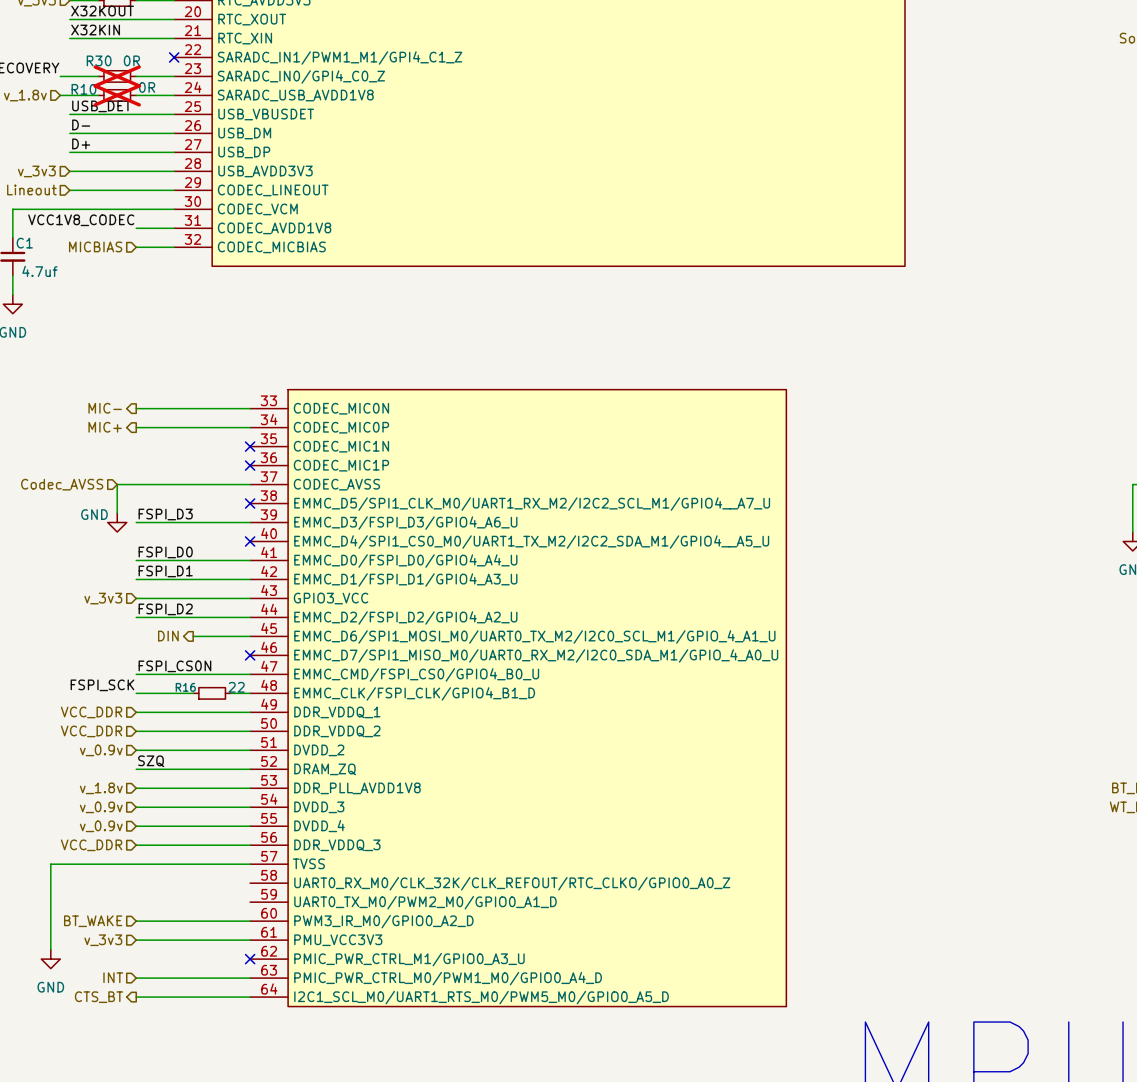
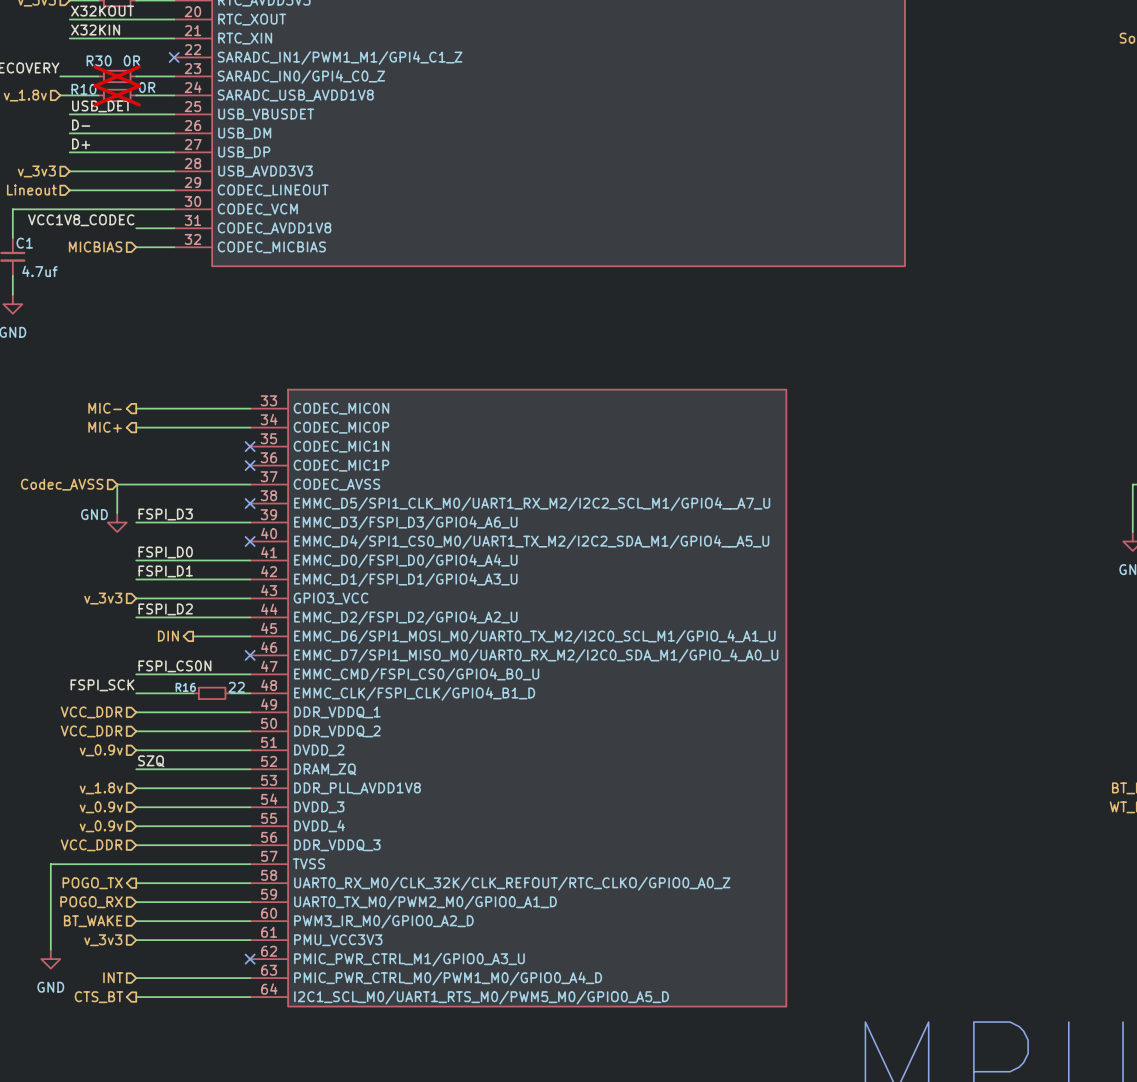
hierarchical label: none -> POGO_TX (92, 883)
wire: none -> (136, 883) (250, 883)
hierarchical label: none -> POGO_RX (91, 902)
wire: none -> (136, 902) (250, 902)

